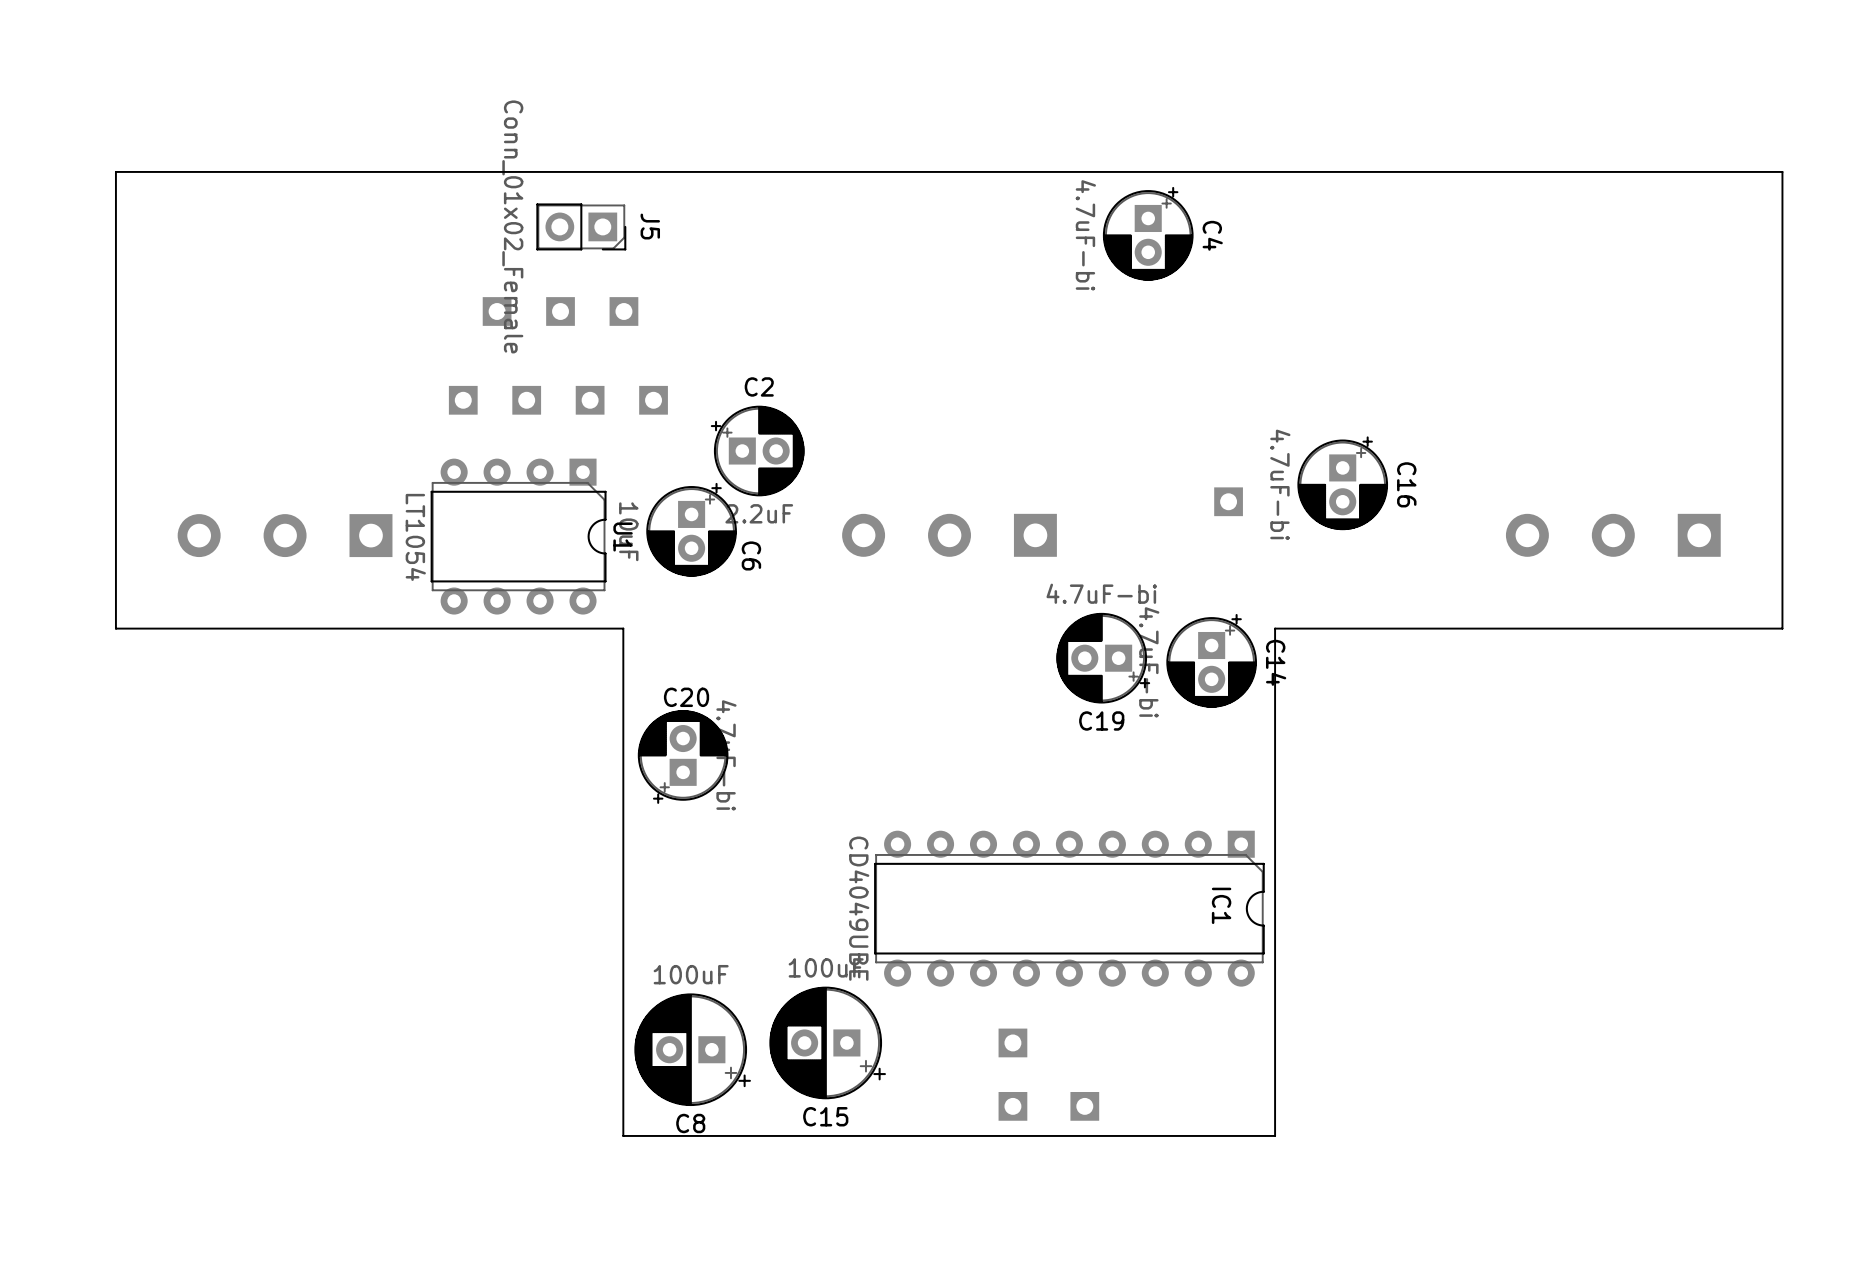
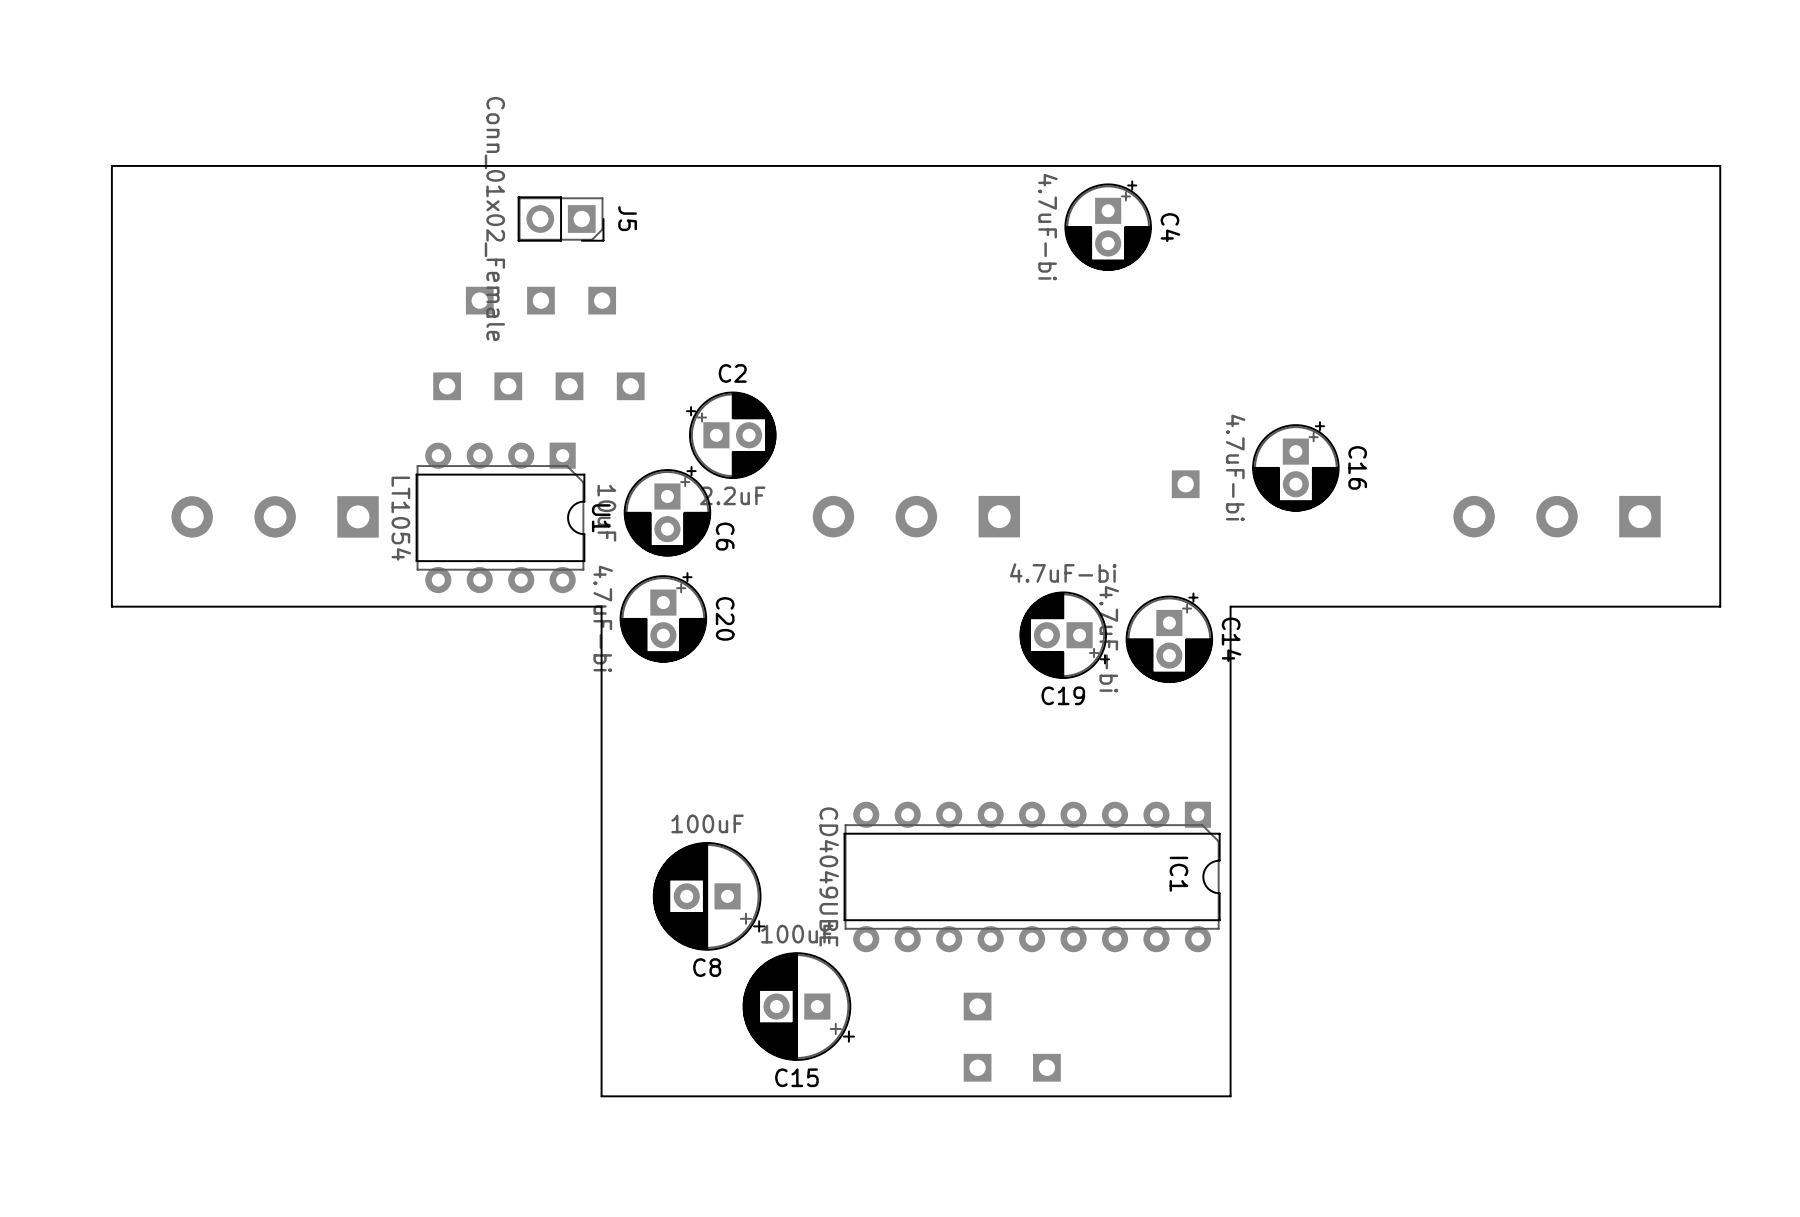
C20 name position: C20 (686, 697) -> C20 (725, 618)
C20 rotation: 0° (683, 757) -> 180° (663, 617)
C20 position: (683, 757) -> (663, 617)
C8 position: (692, 1049) -> (709, 896)

